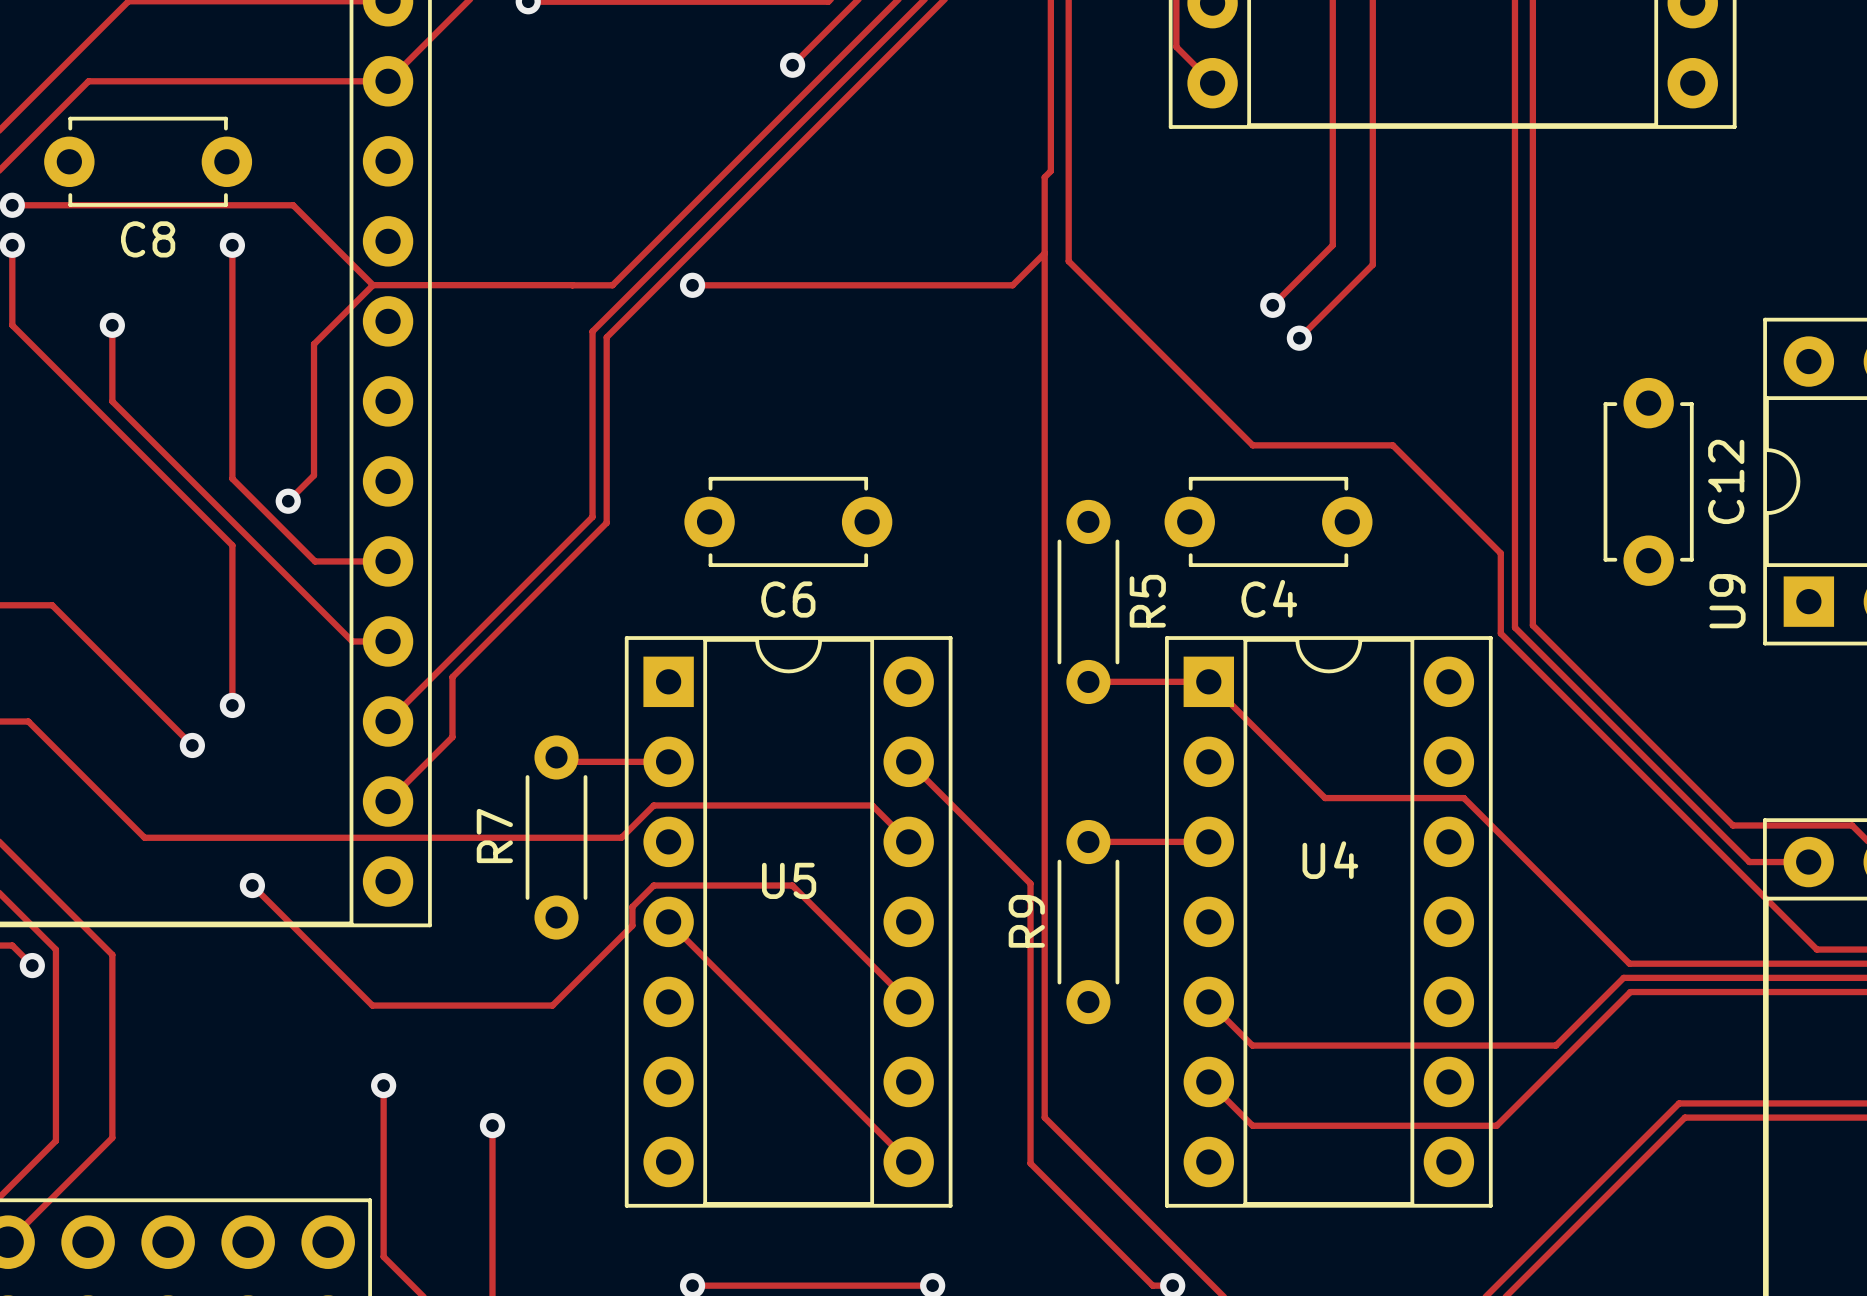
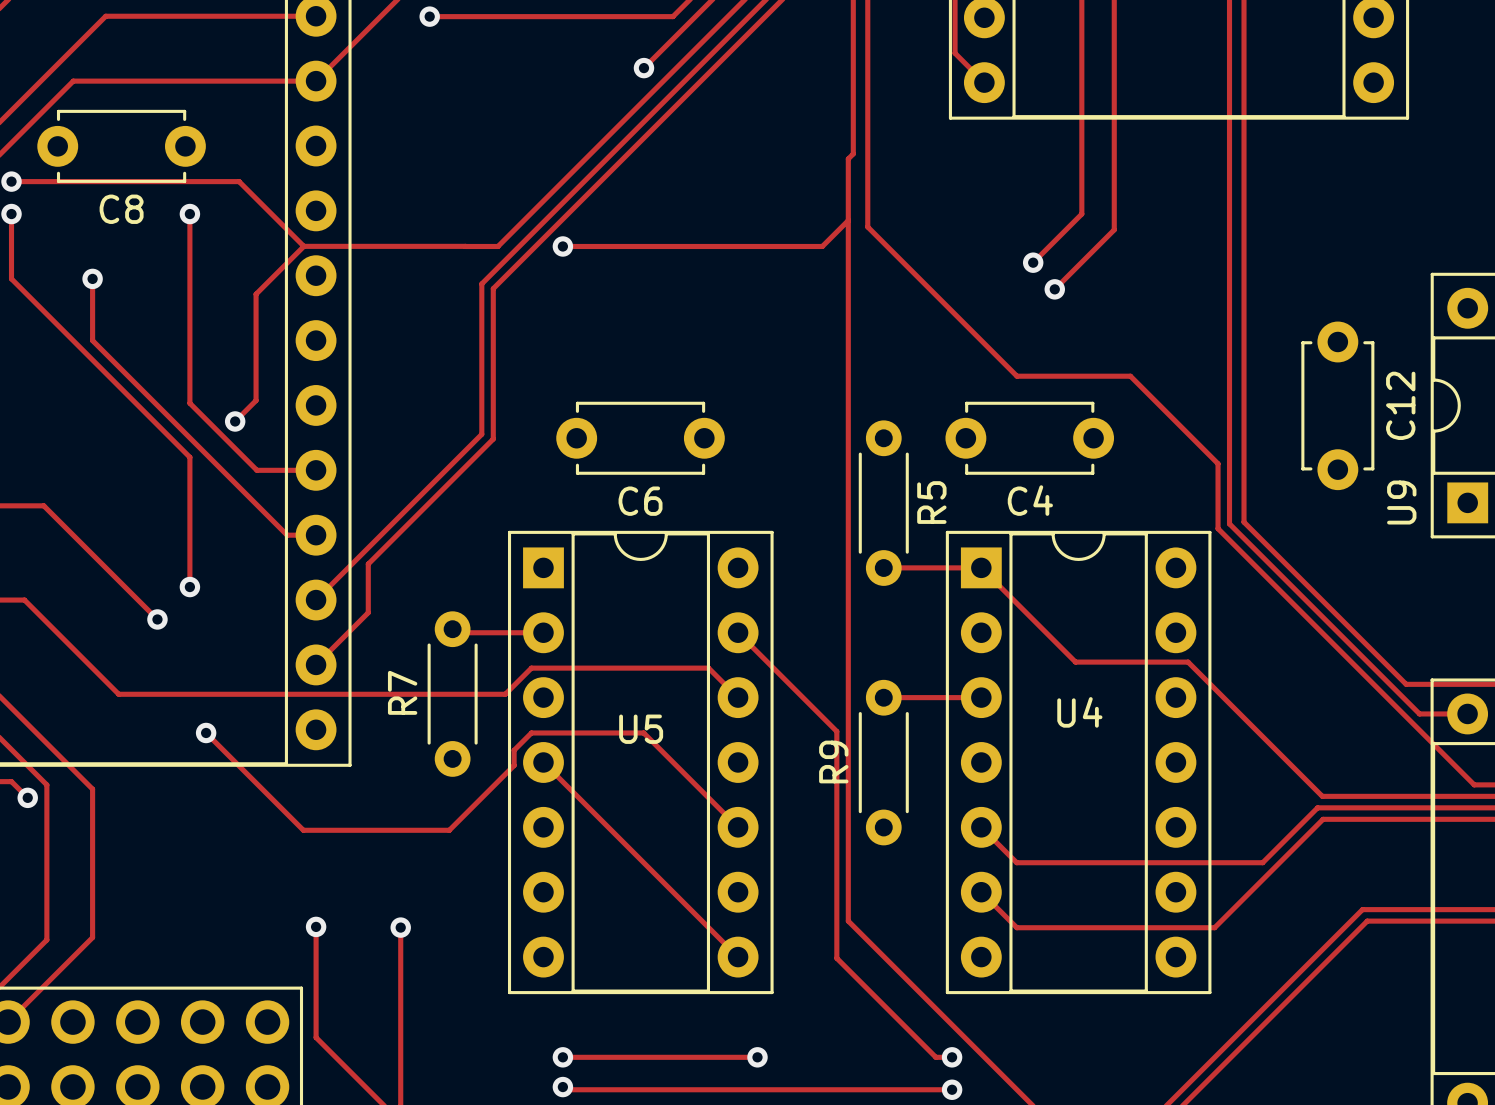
track: (388, 1081) (383, 1085) (383, 1256) (388, 1261) -> (316, 926) (316, 1037)
via position: (383, 1085) -> (316, 926)

